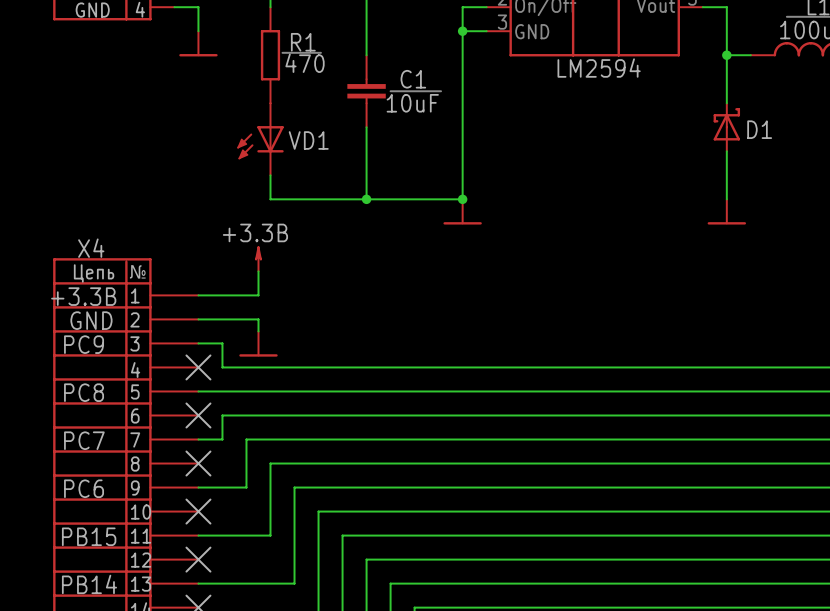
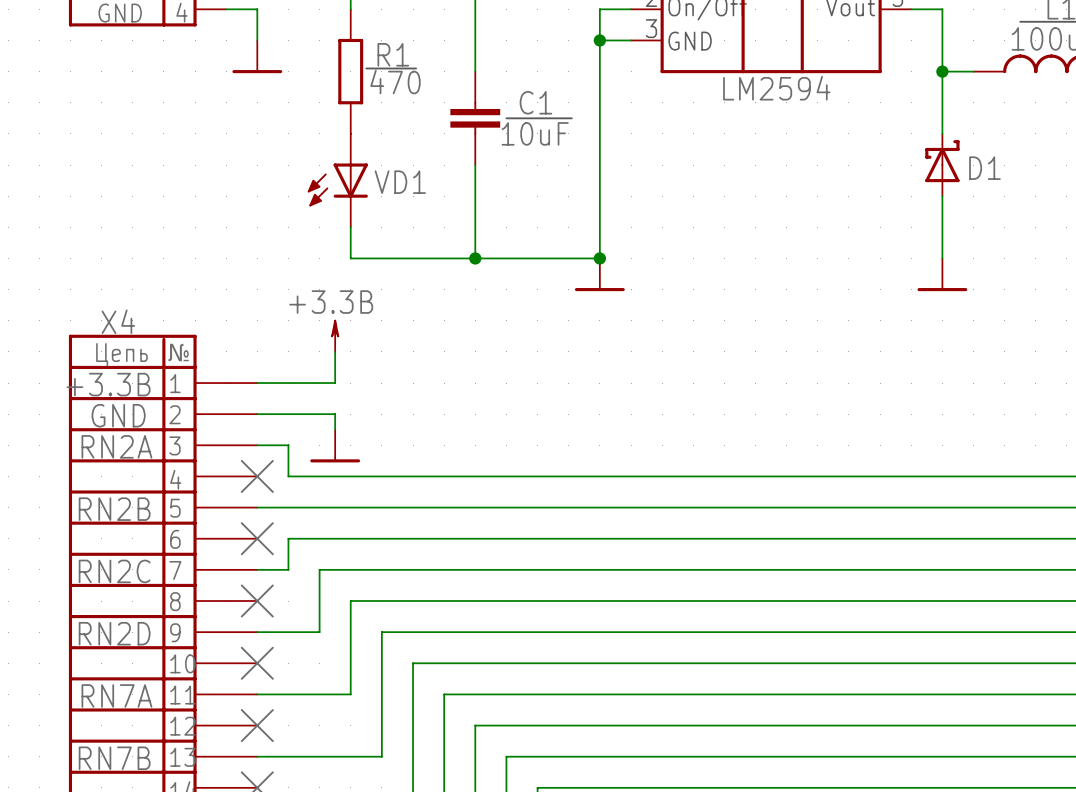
text: PC9 (84, 344) -> none
text: none -> RN2A (116, 446)
text: PC8 (84, 392) -> none
text: none -> RN2B (114, 509)
text: PC7 (84, 440) -> none
text: none -> RN2C (114, 571)
text: PC6 (84, 488) -> none
text: none -> RN2D (114, 633)
text: PB15 (89, 536) -> RN7A (116, 695)
text: PB14 (89, 584) -> RN7B (114, 758)

